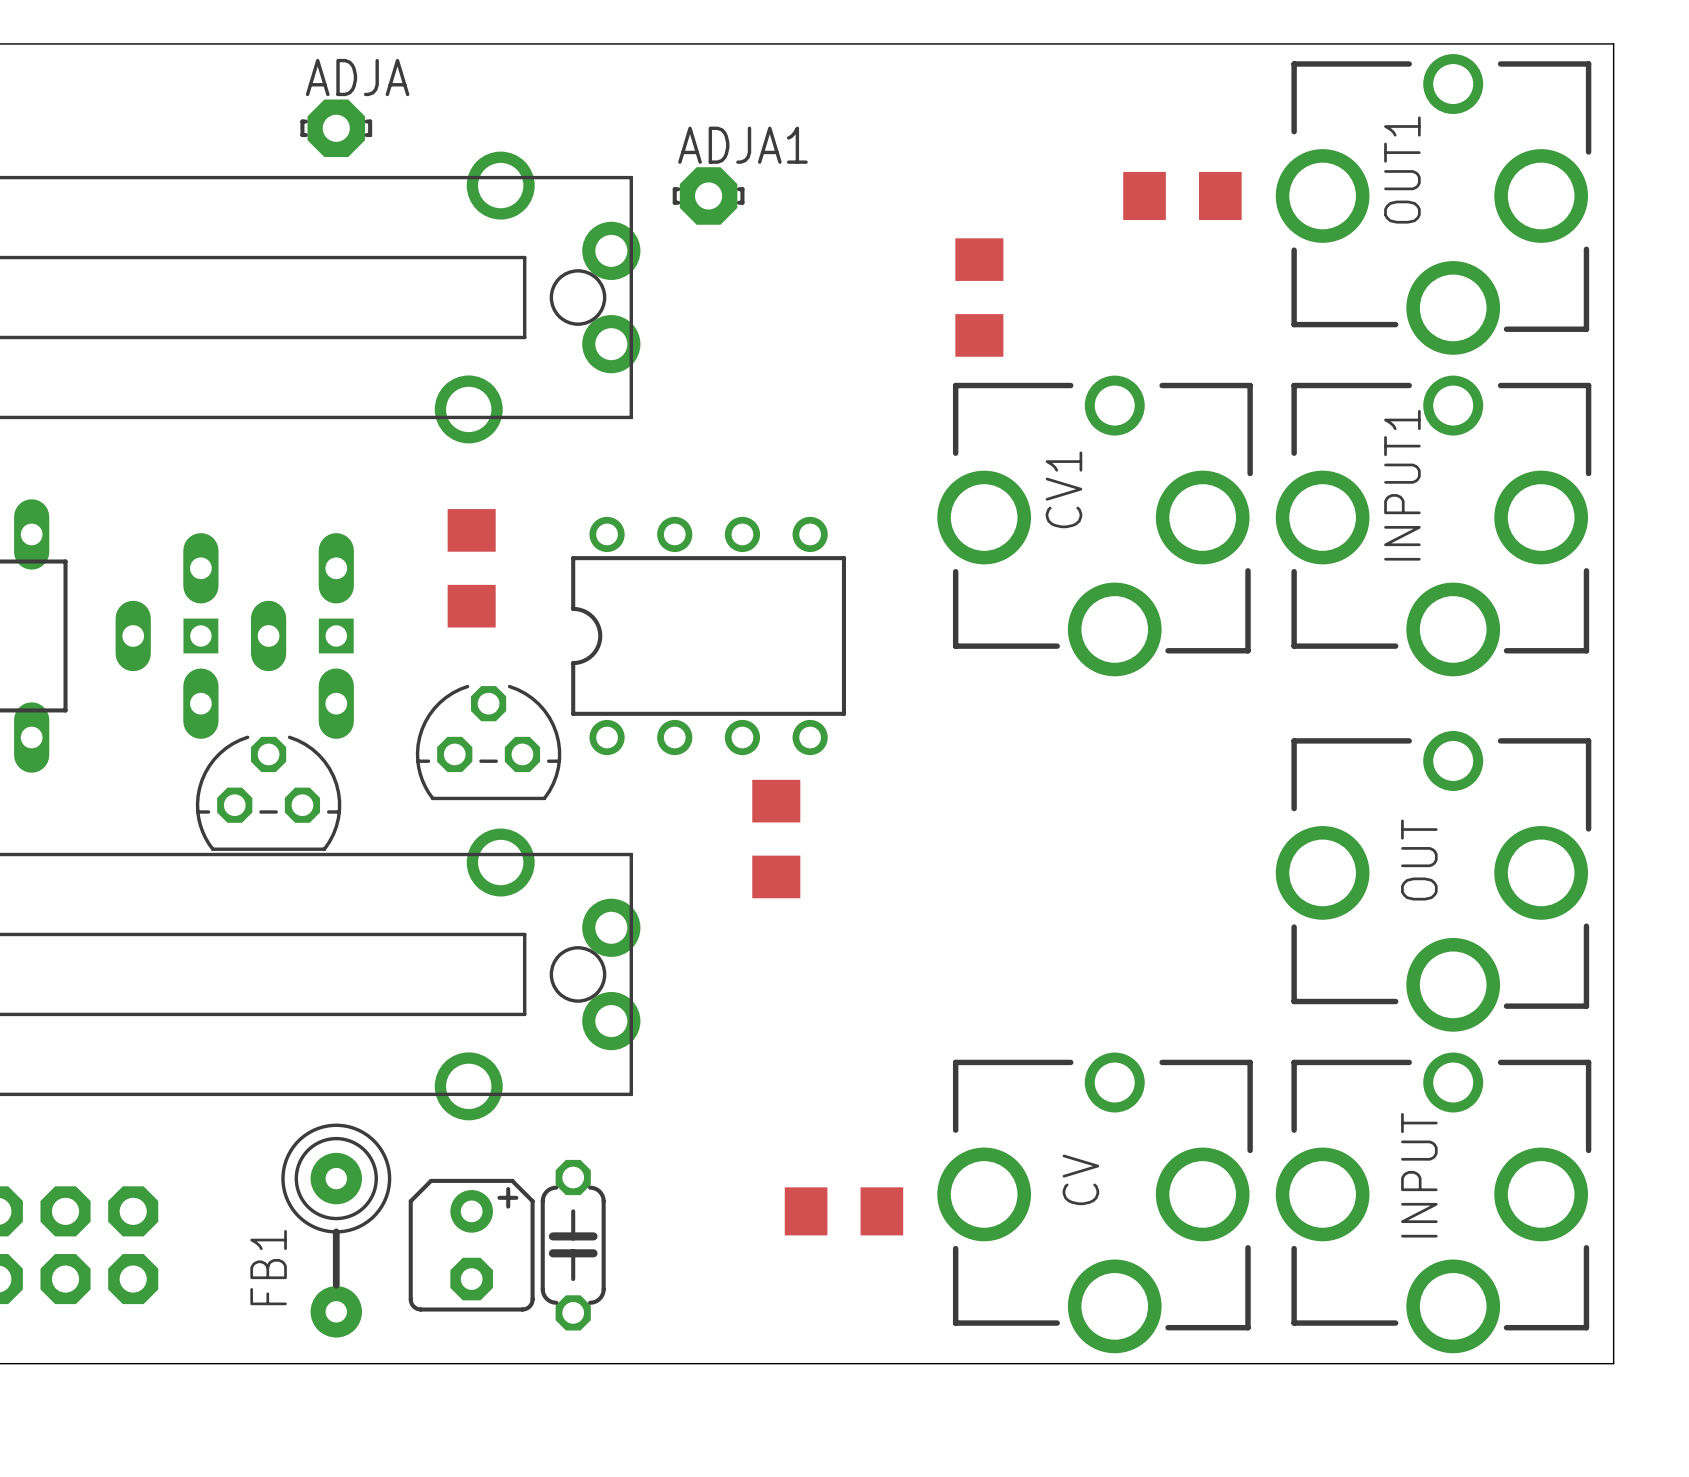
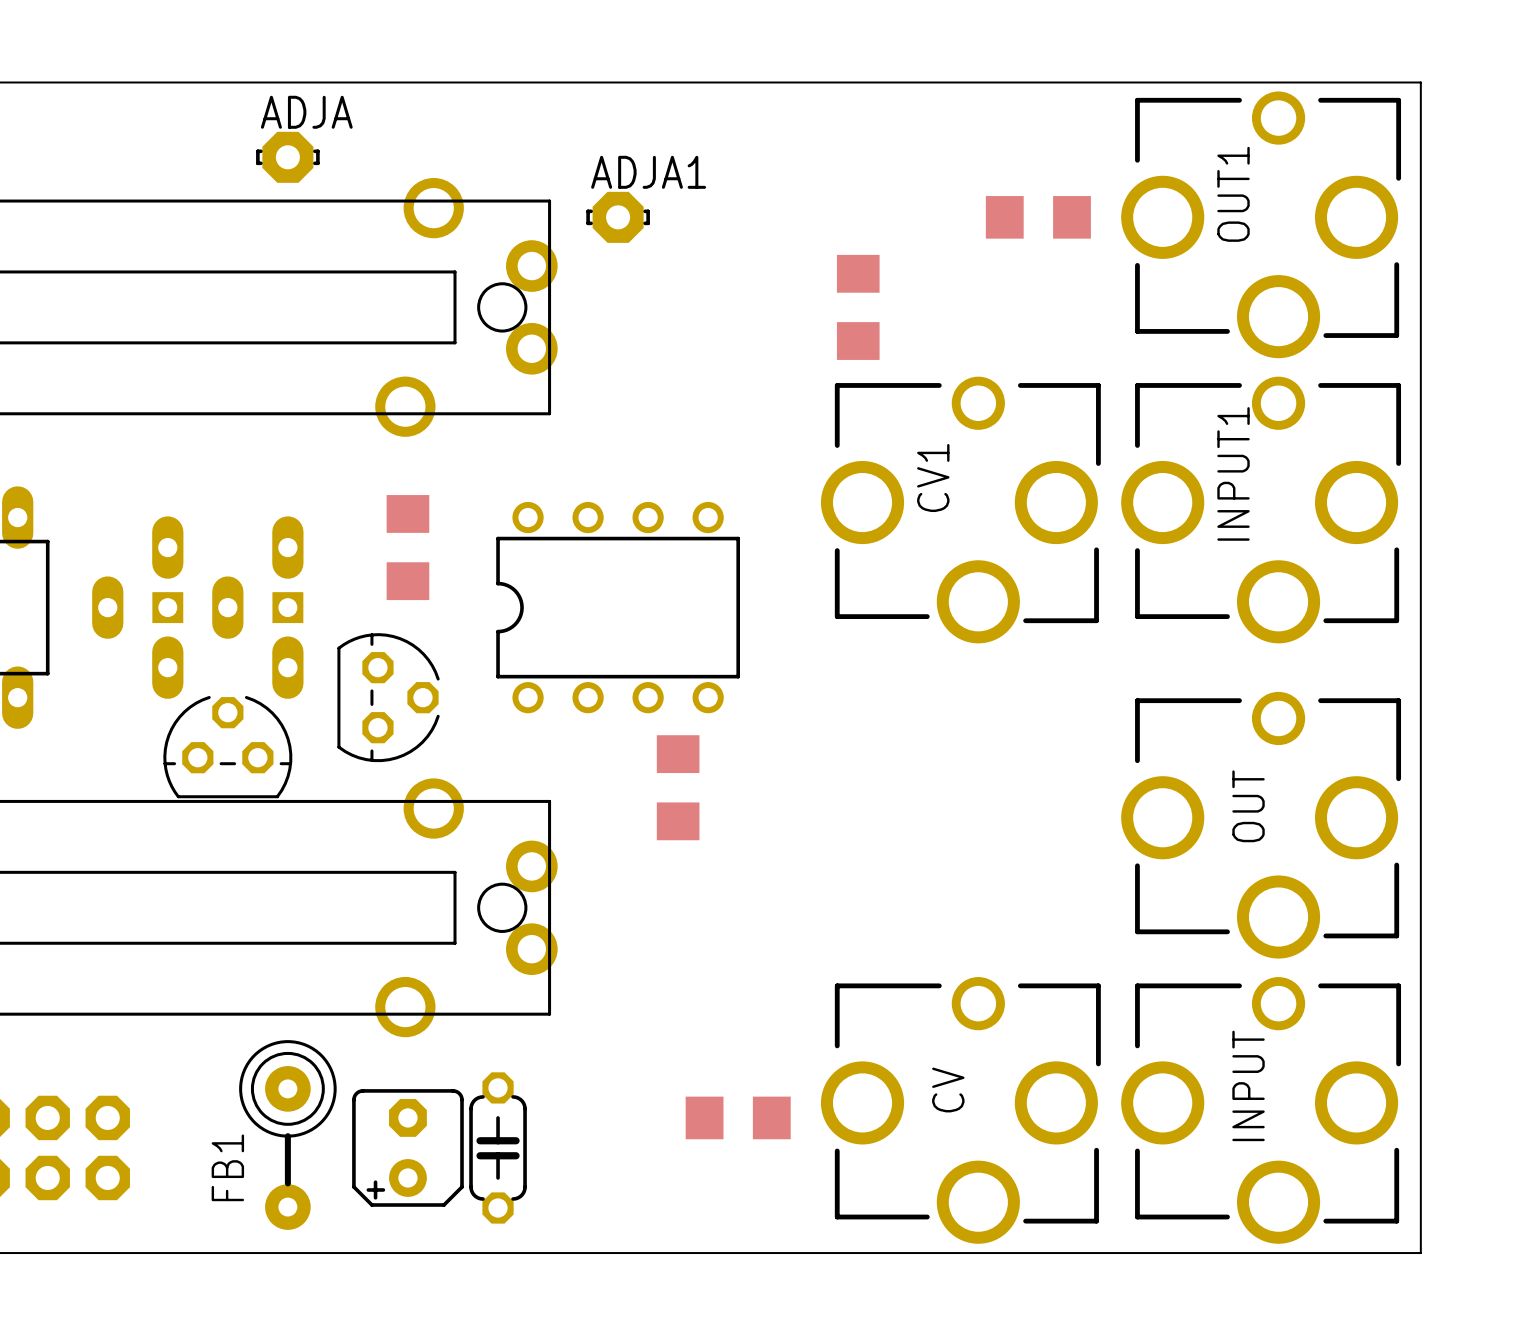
part rotation: 0° (488, 742) -> 90° clockwise (388, 697)
part rotation: 0° (471, 1245) -> 180° (407, 1147)
part rotation: 0° (573, 1245) -> 180° (498, 1147)

